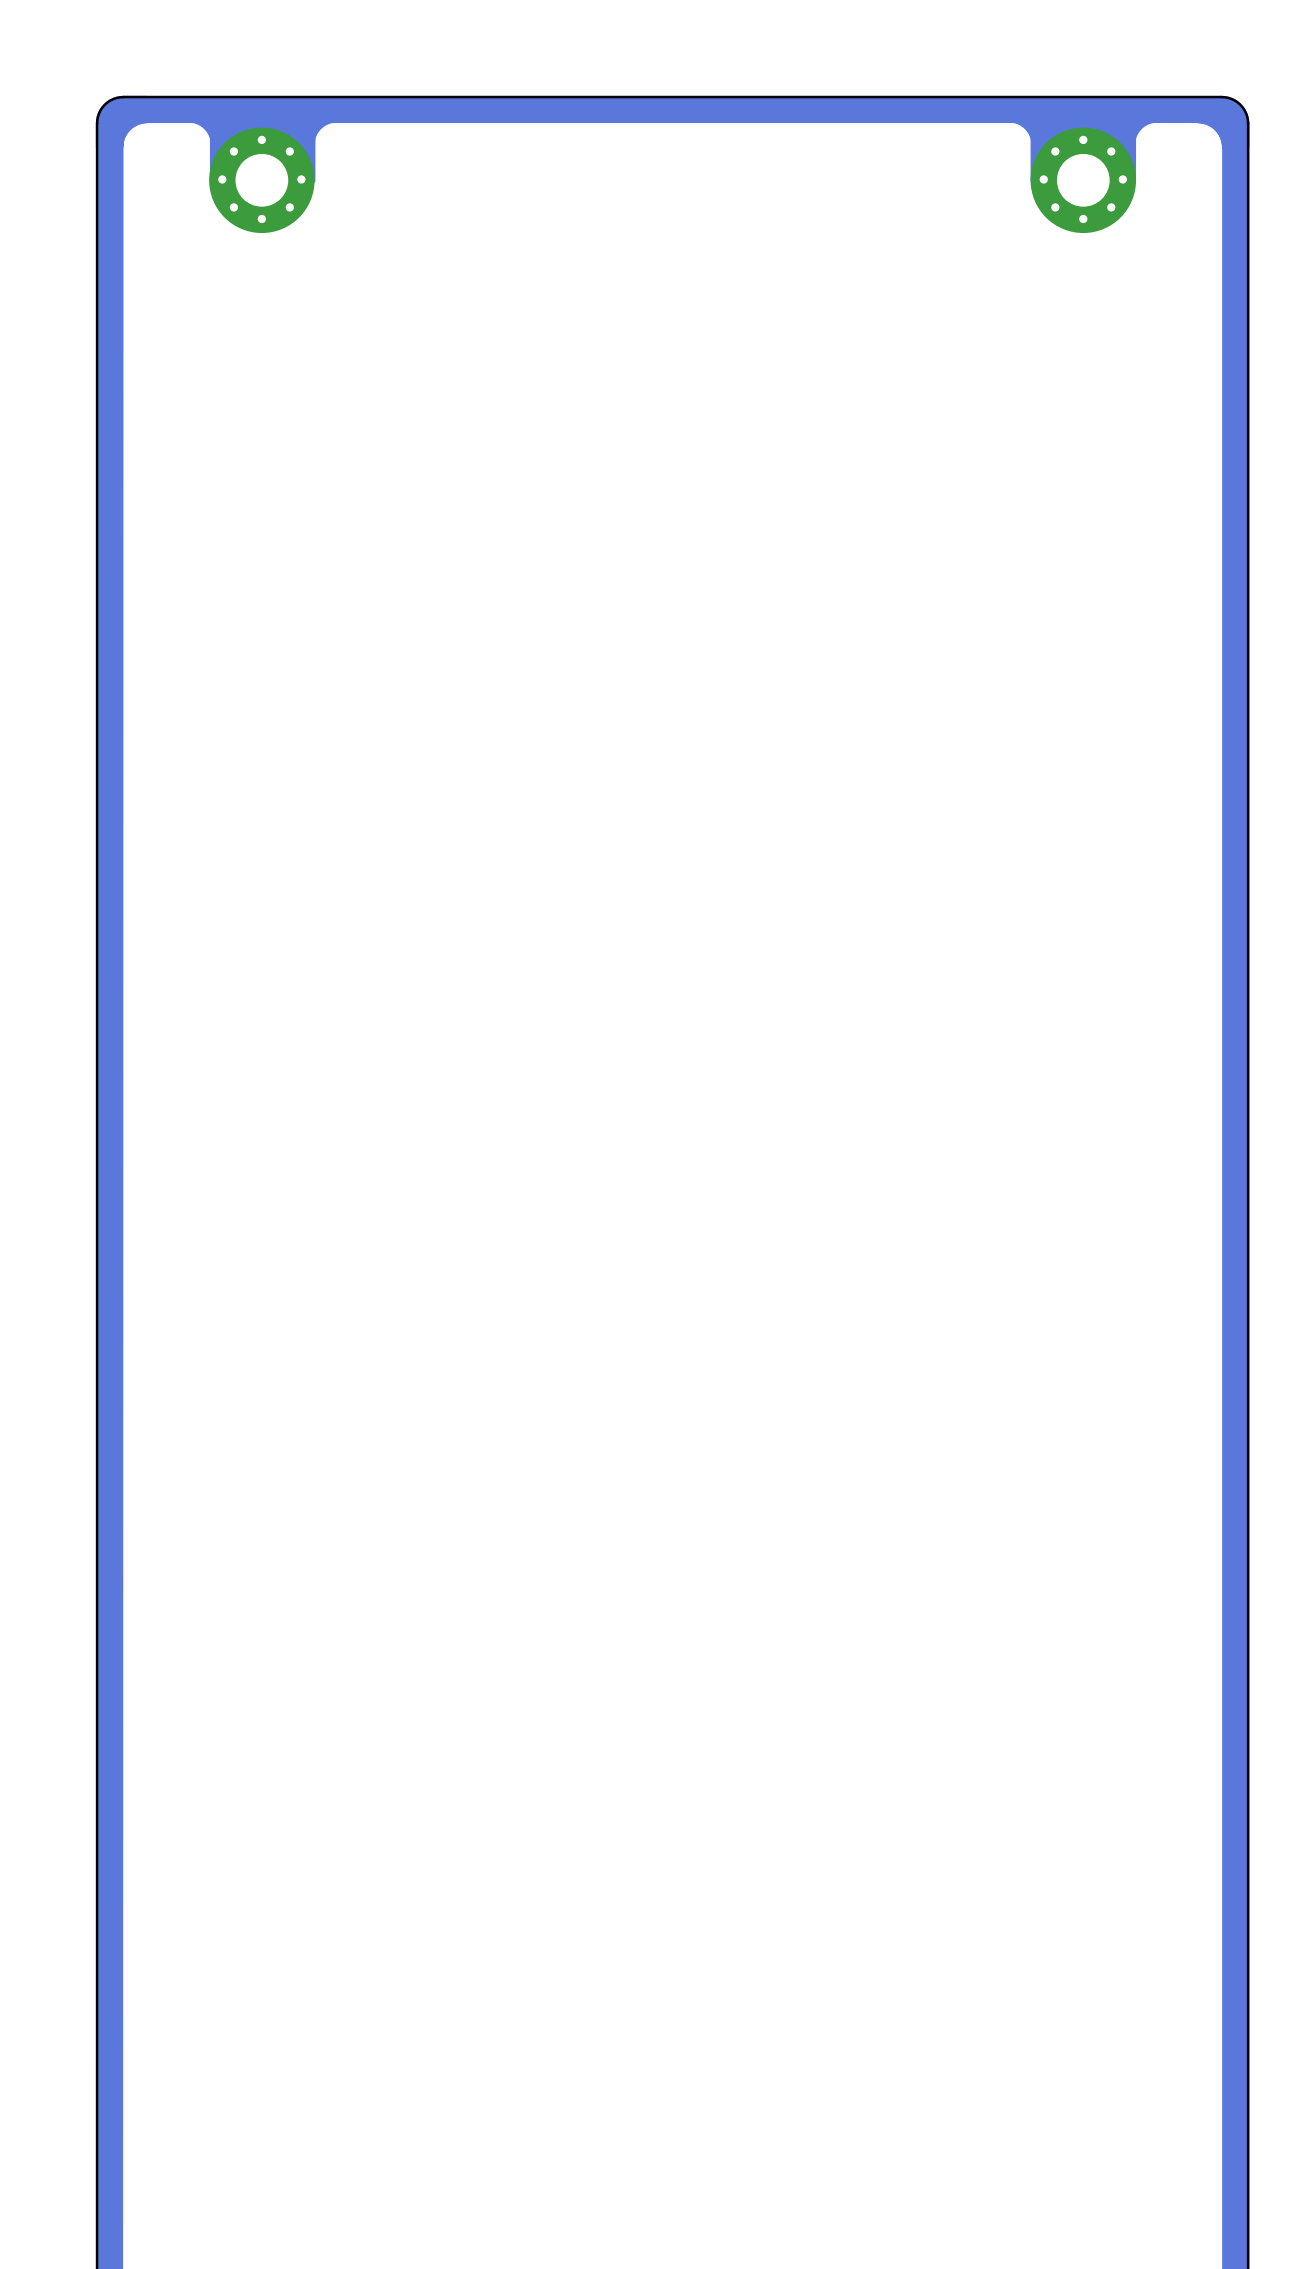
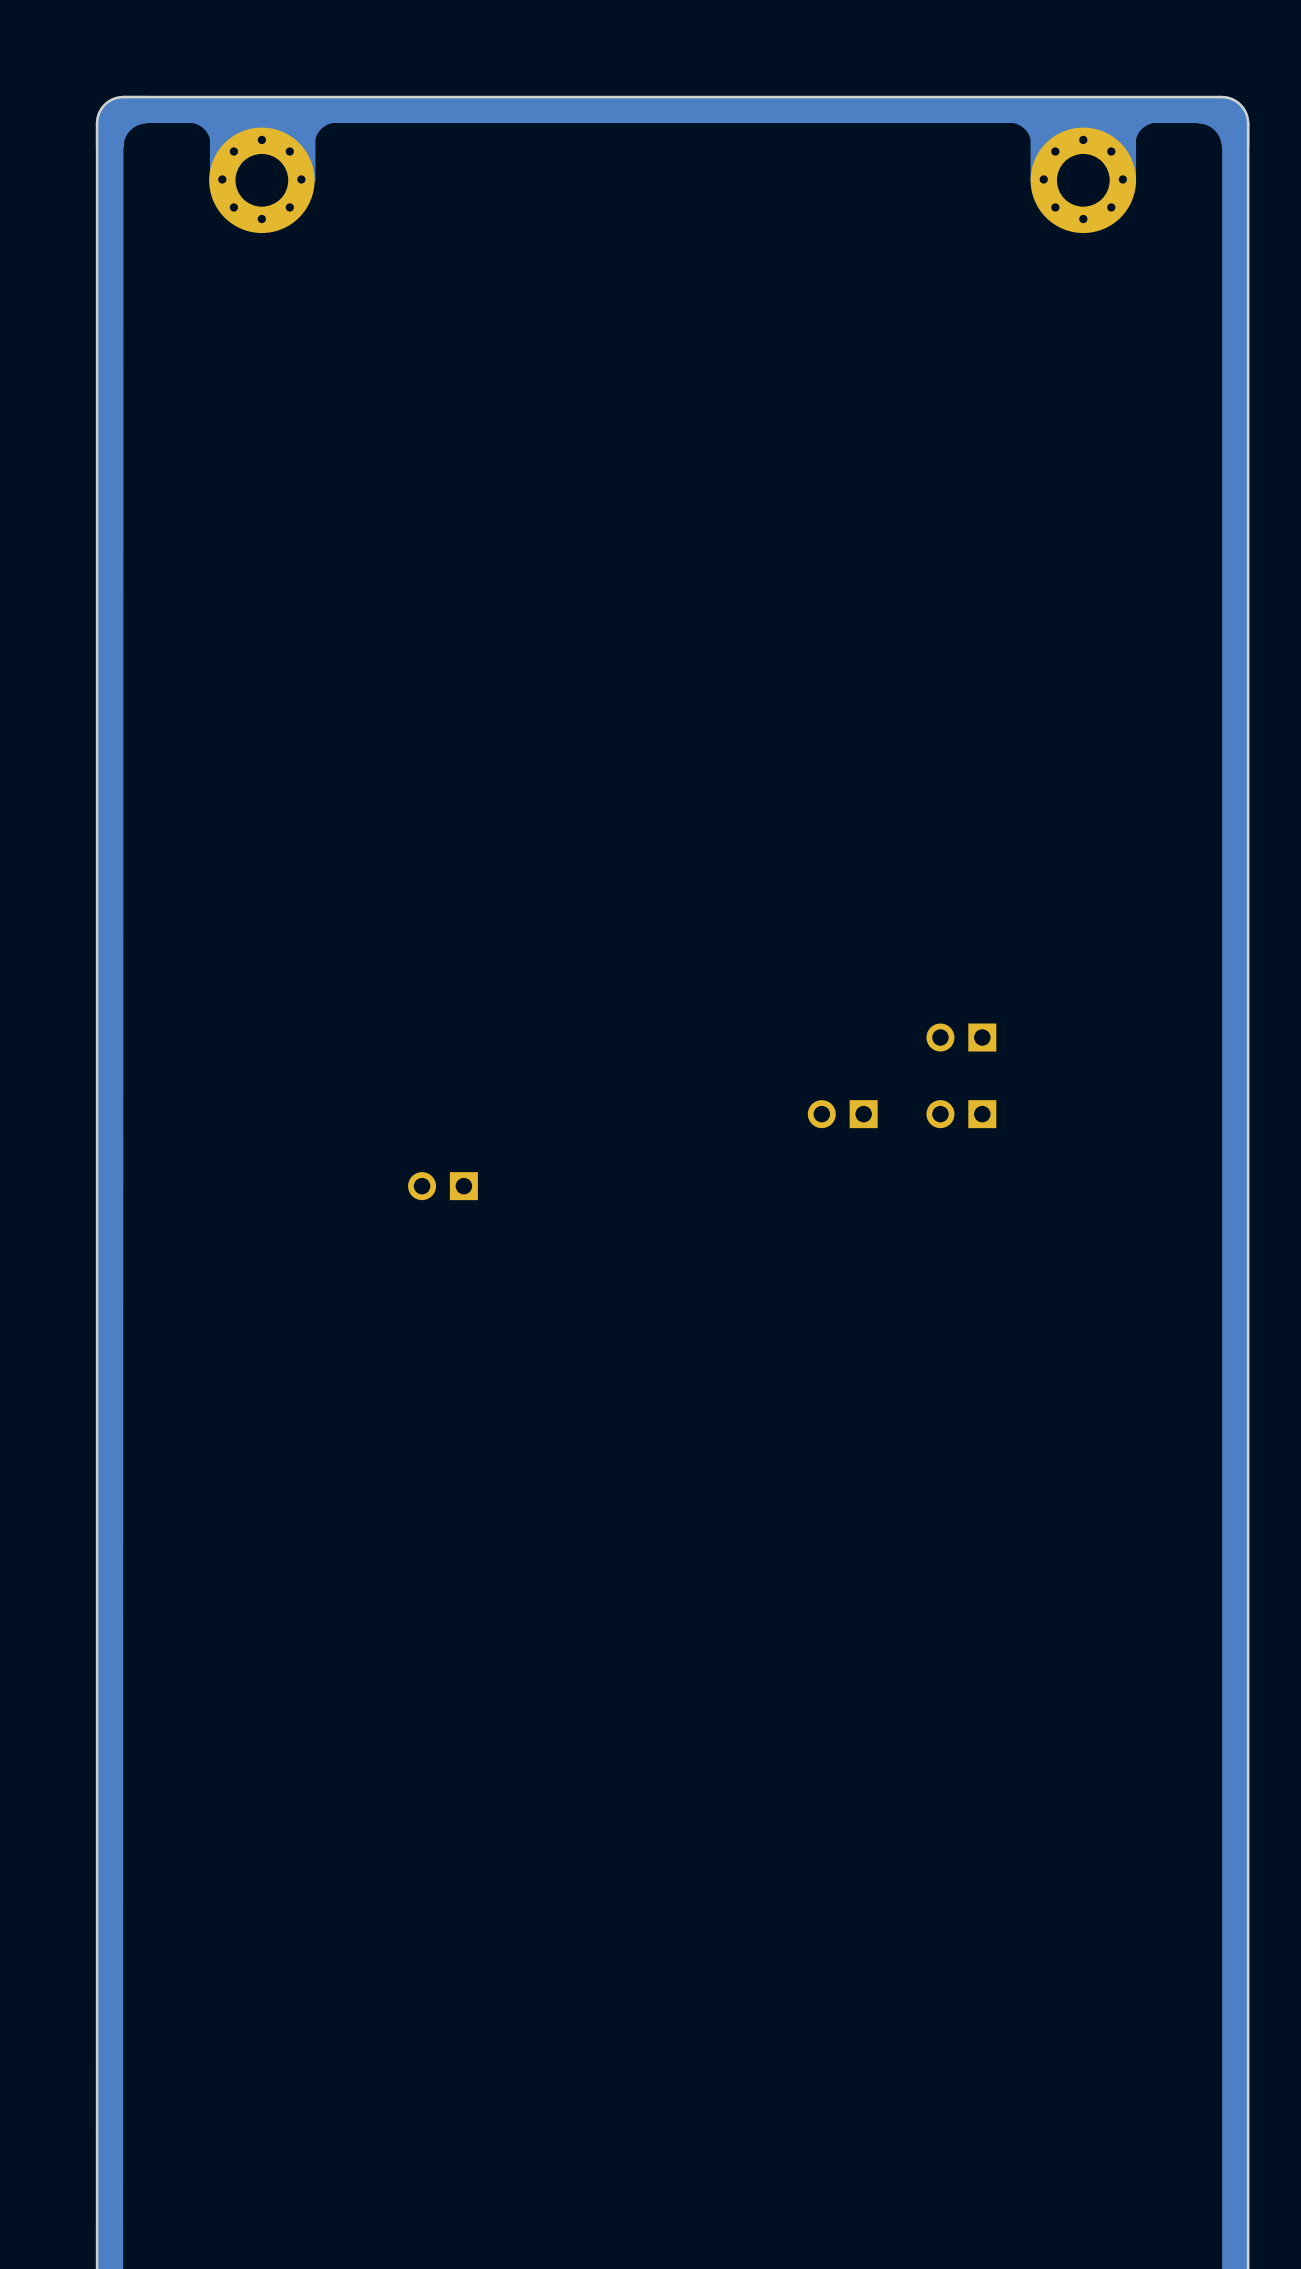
part: none -> (961, 1037)
part: none -> (842, 1114)
part: none -> (961, 1114)
part: none -> (442, 1186)

